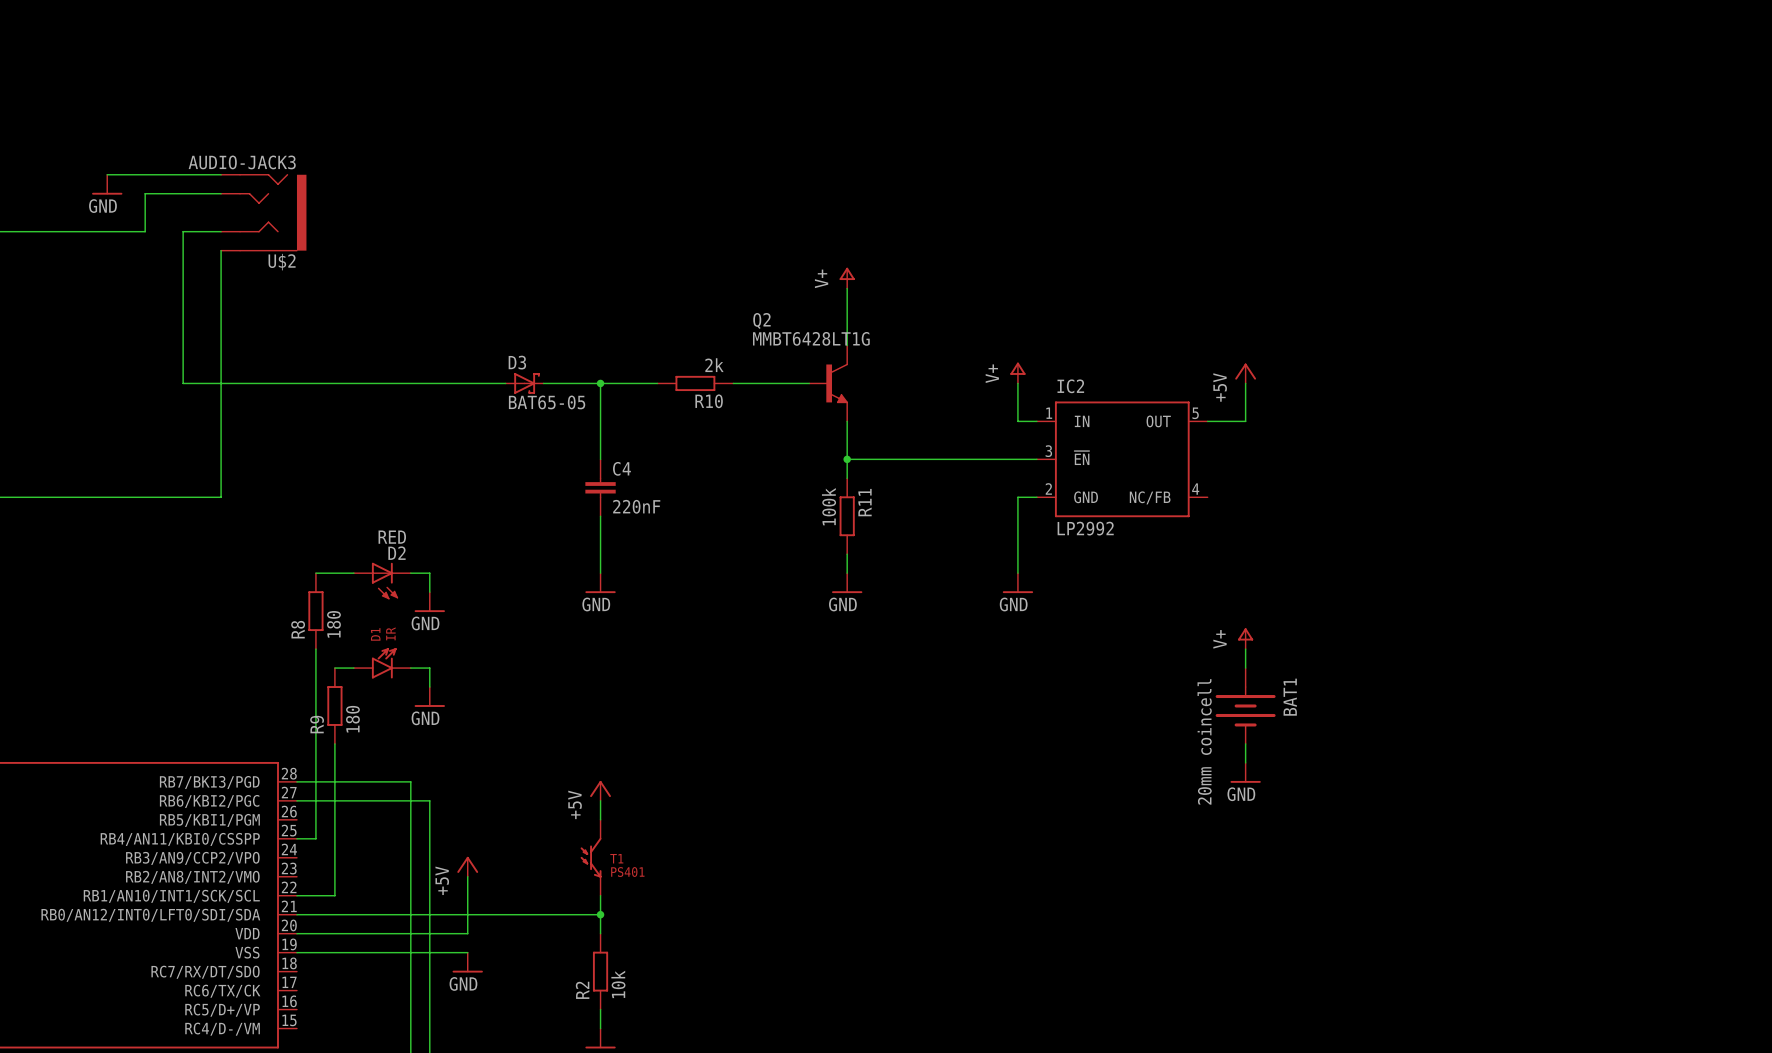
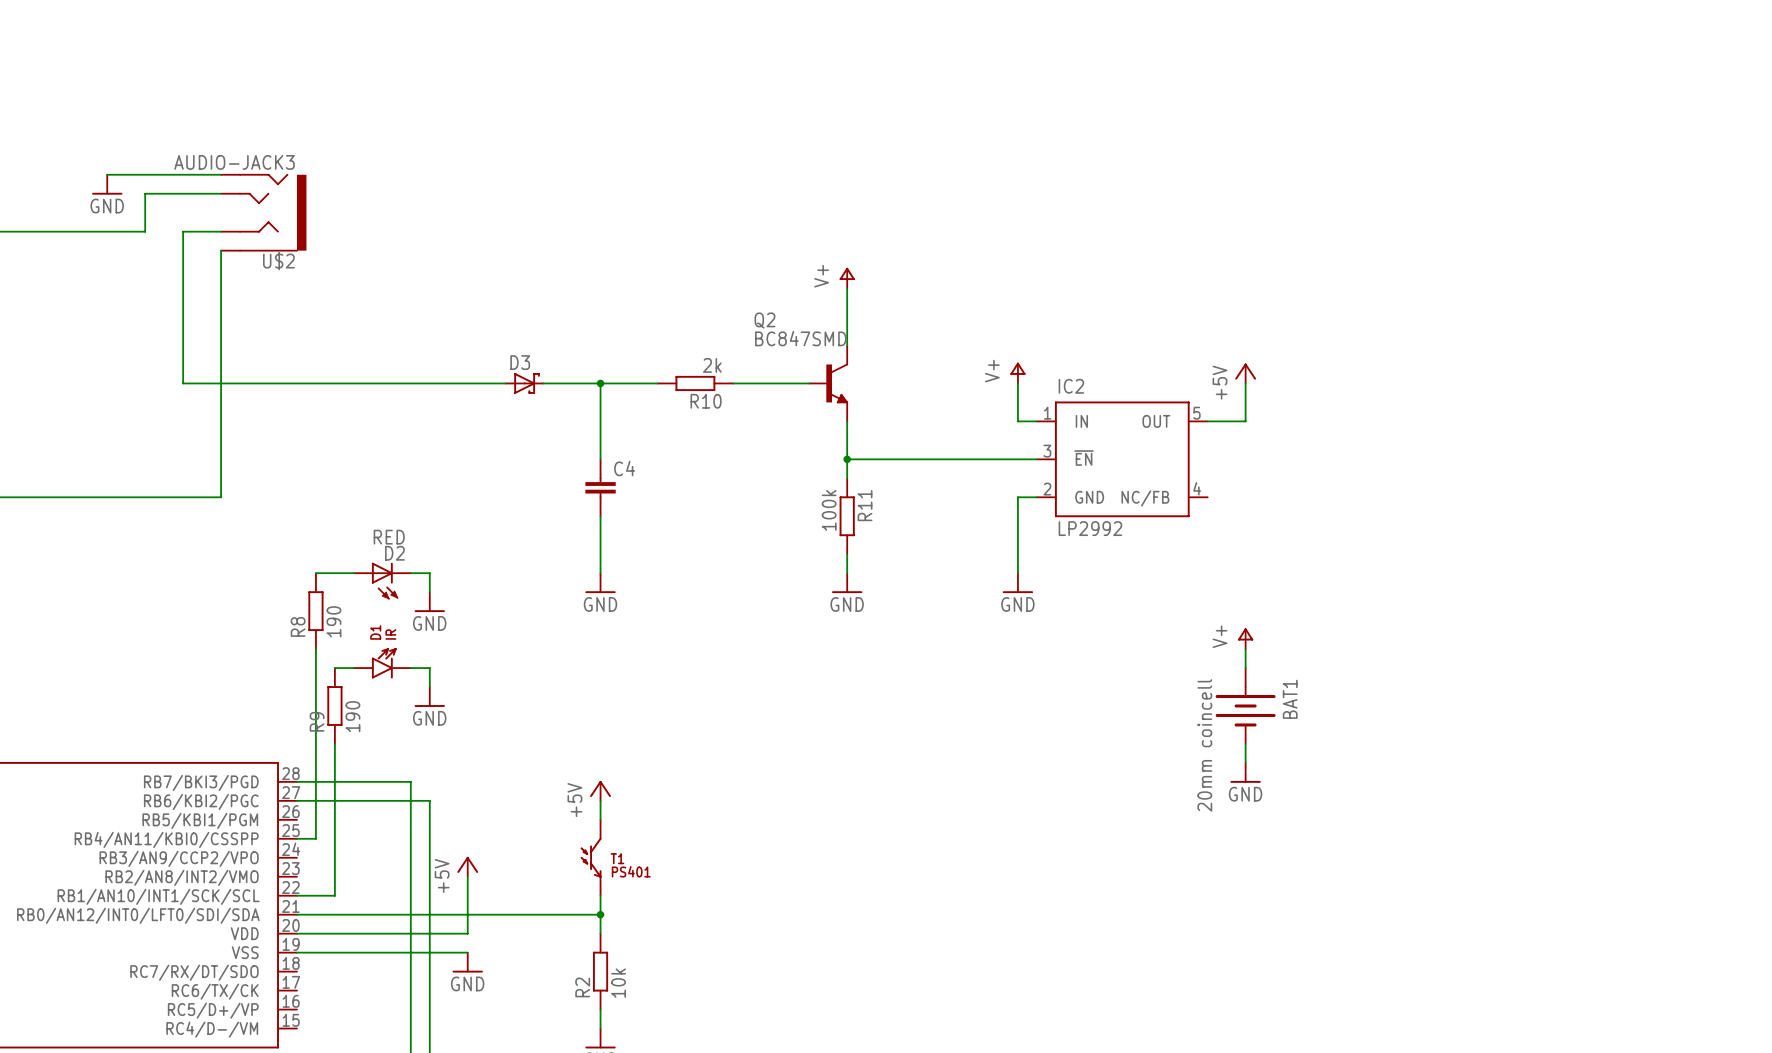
Q2 value: MMBT6428LT1G (811, 338) -> BC847SMD (800, 338)
D3 value: BAT65-05 (547, 402) -> none
C4 value: 220nF (636, 506) -> none
R8 value: 180 (333, 624) -> 190 (333, 621)
R9 value: 180 (352, 719) -> 190 (352, 716)

